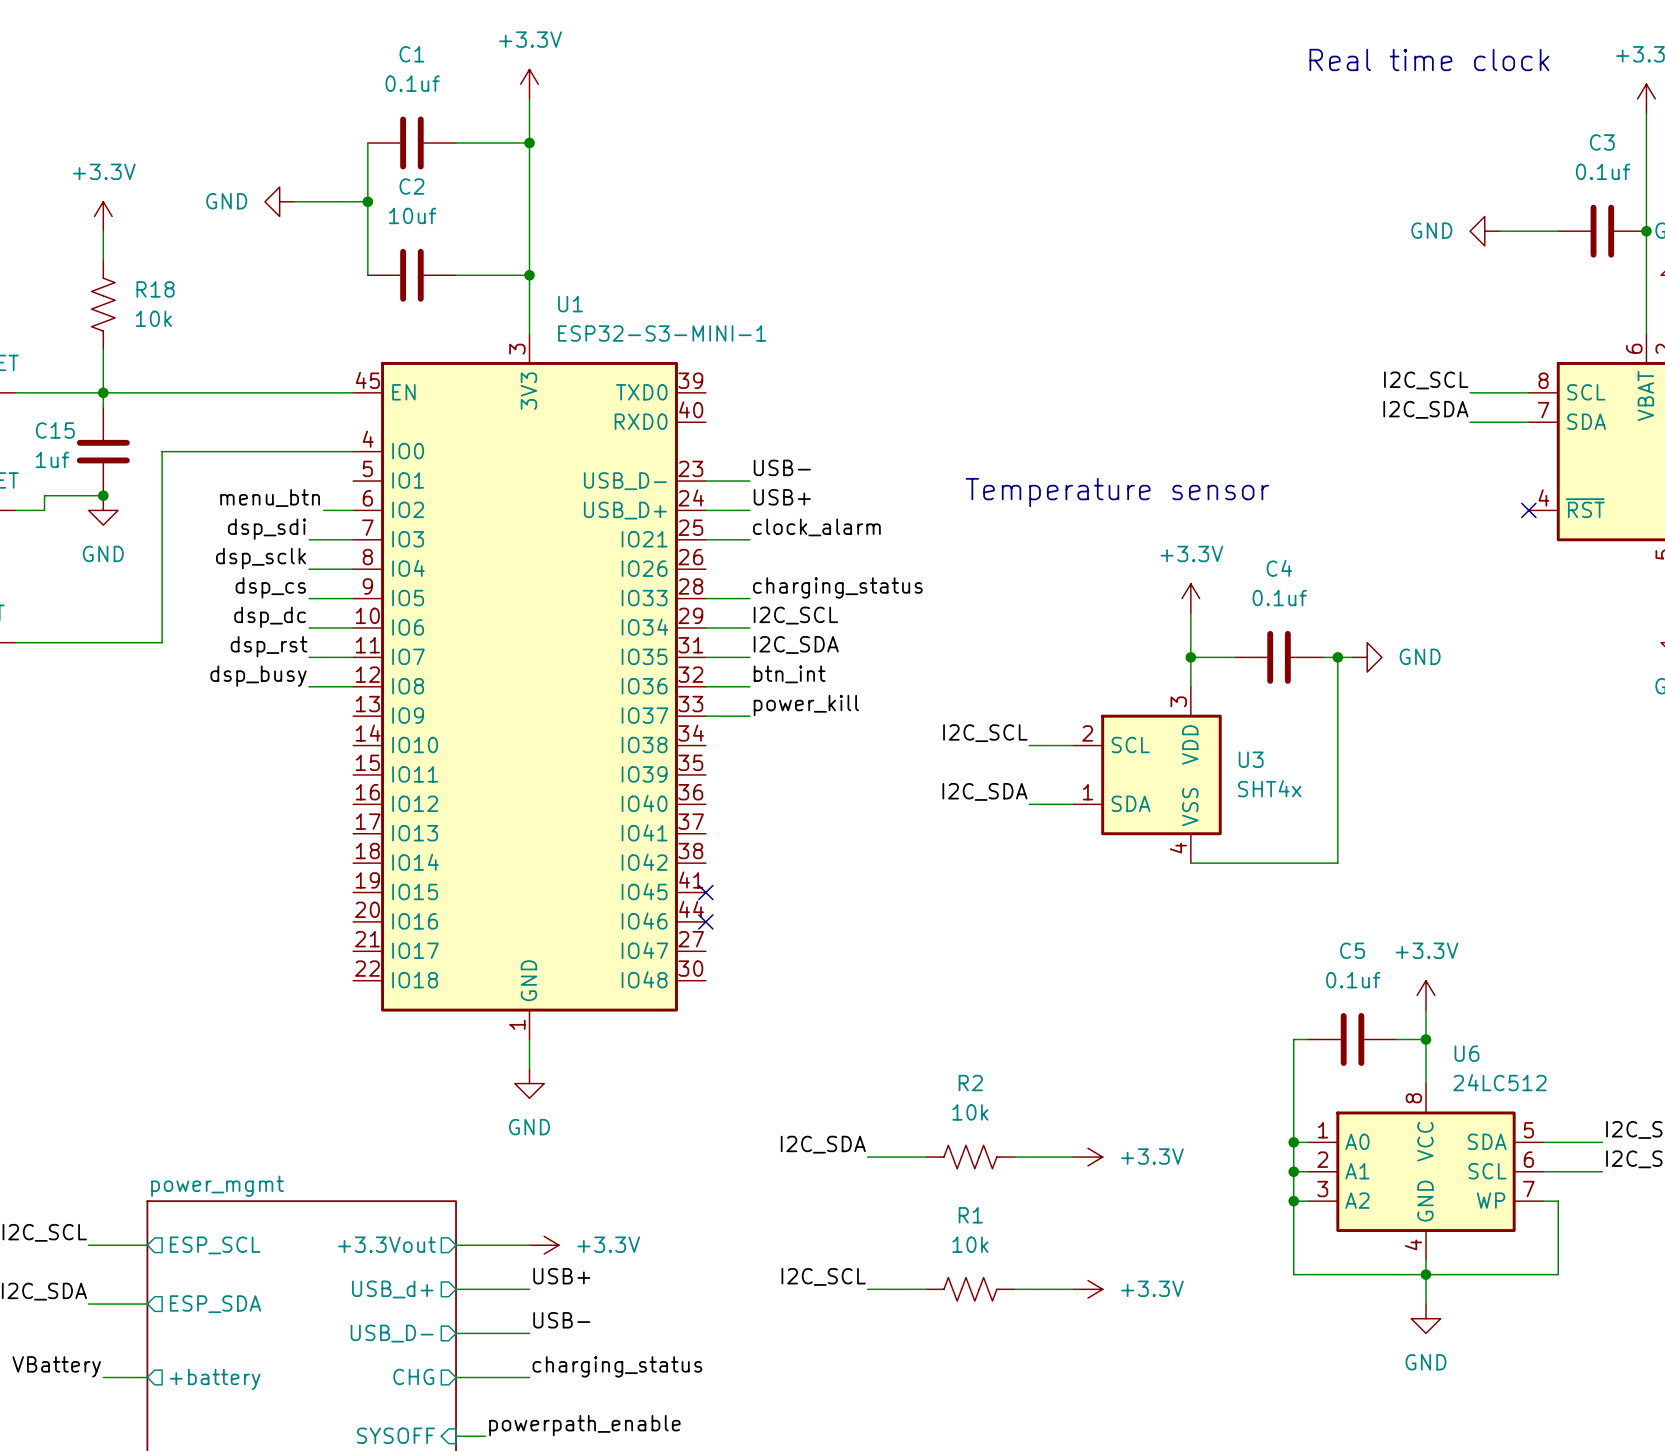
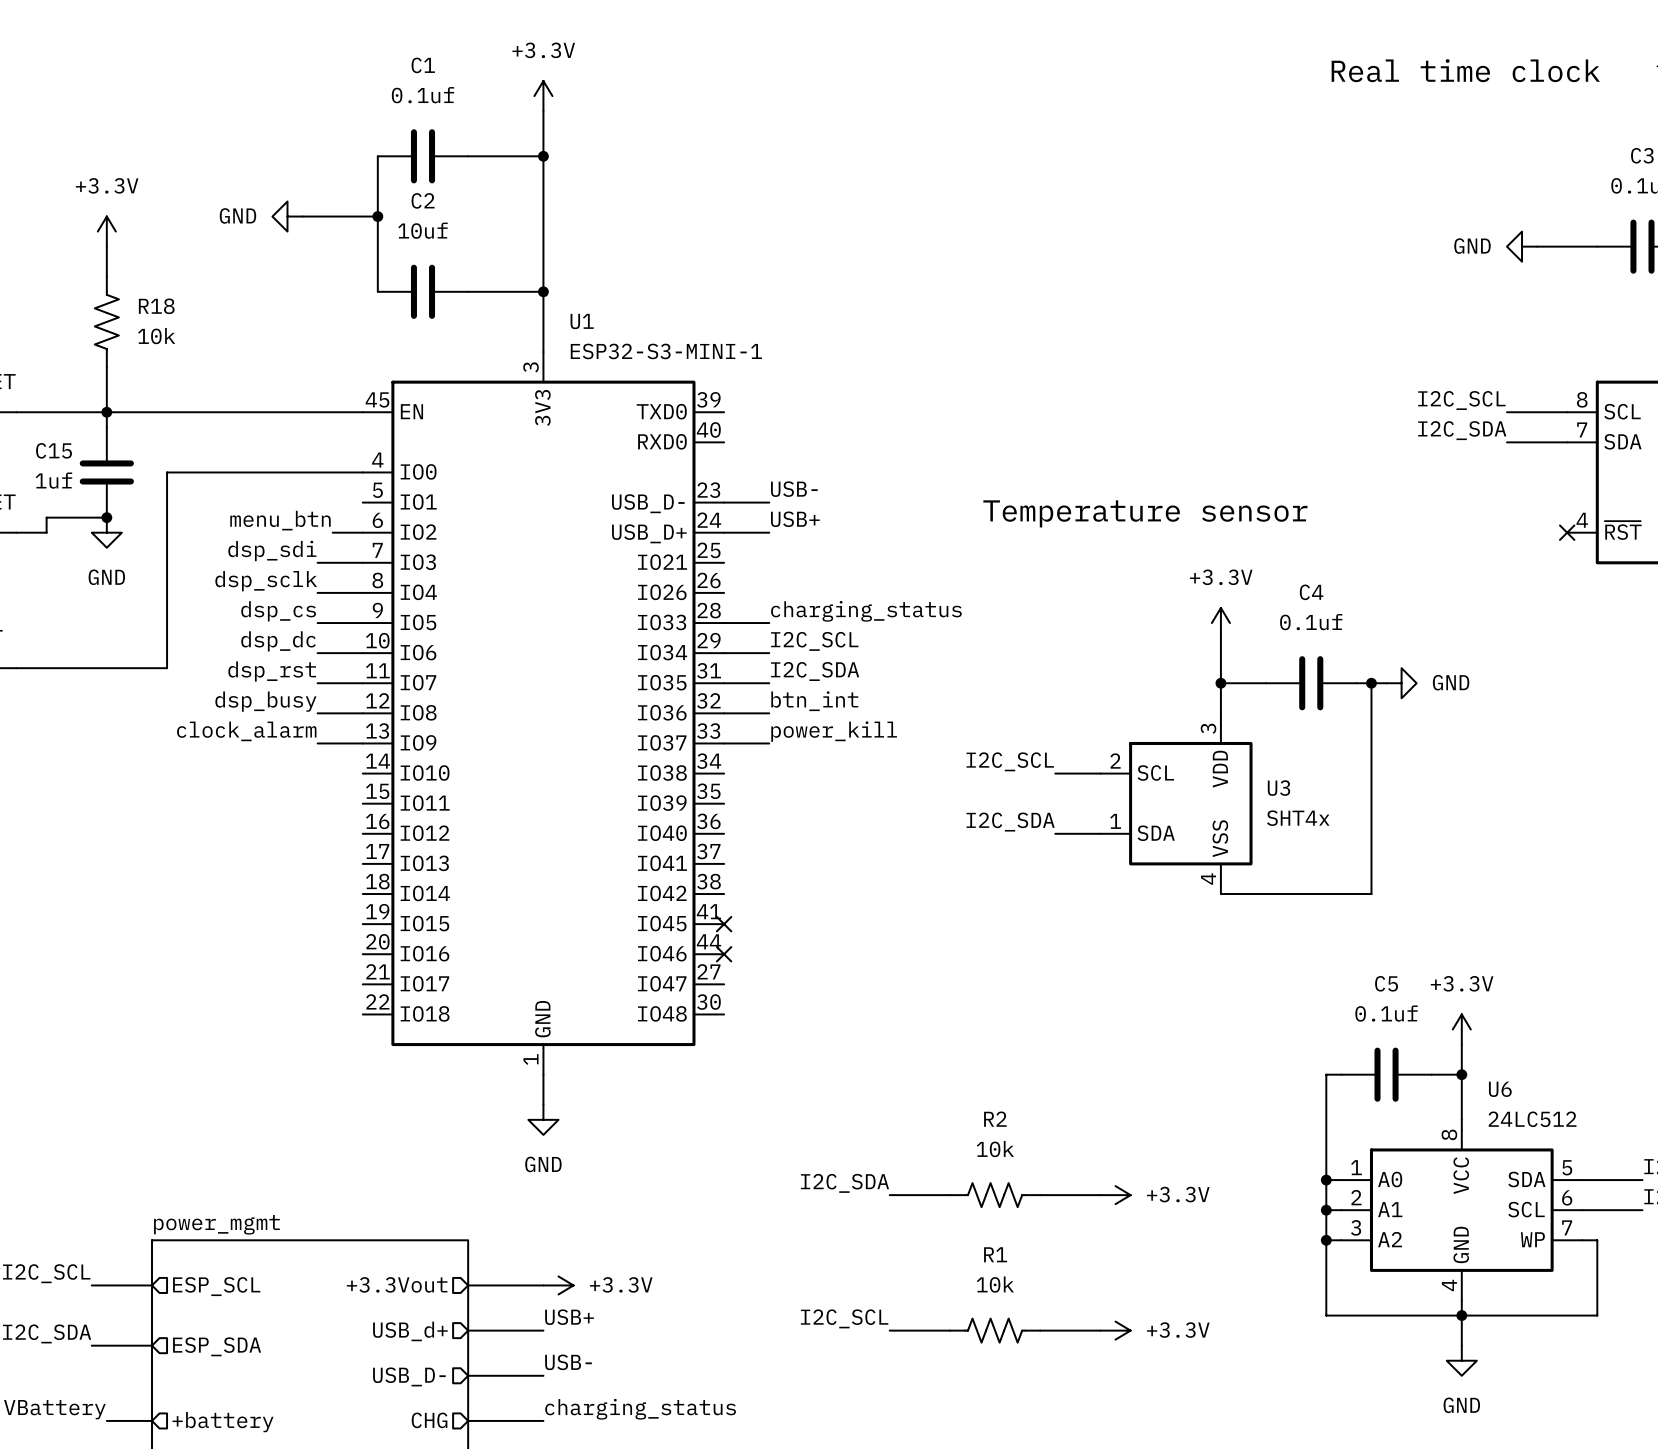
label: clock_alarm (816, 527) -> none
wire: (705, 539) (749, 539) -> none
label: none -> clock_alarm (246, 731)
wire: none -> (317, 743) (362, 743)

